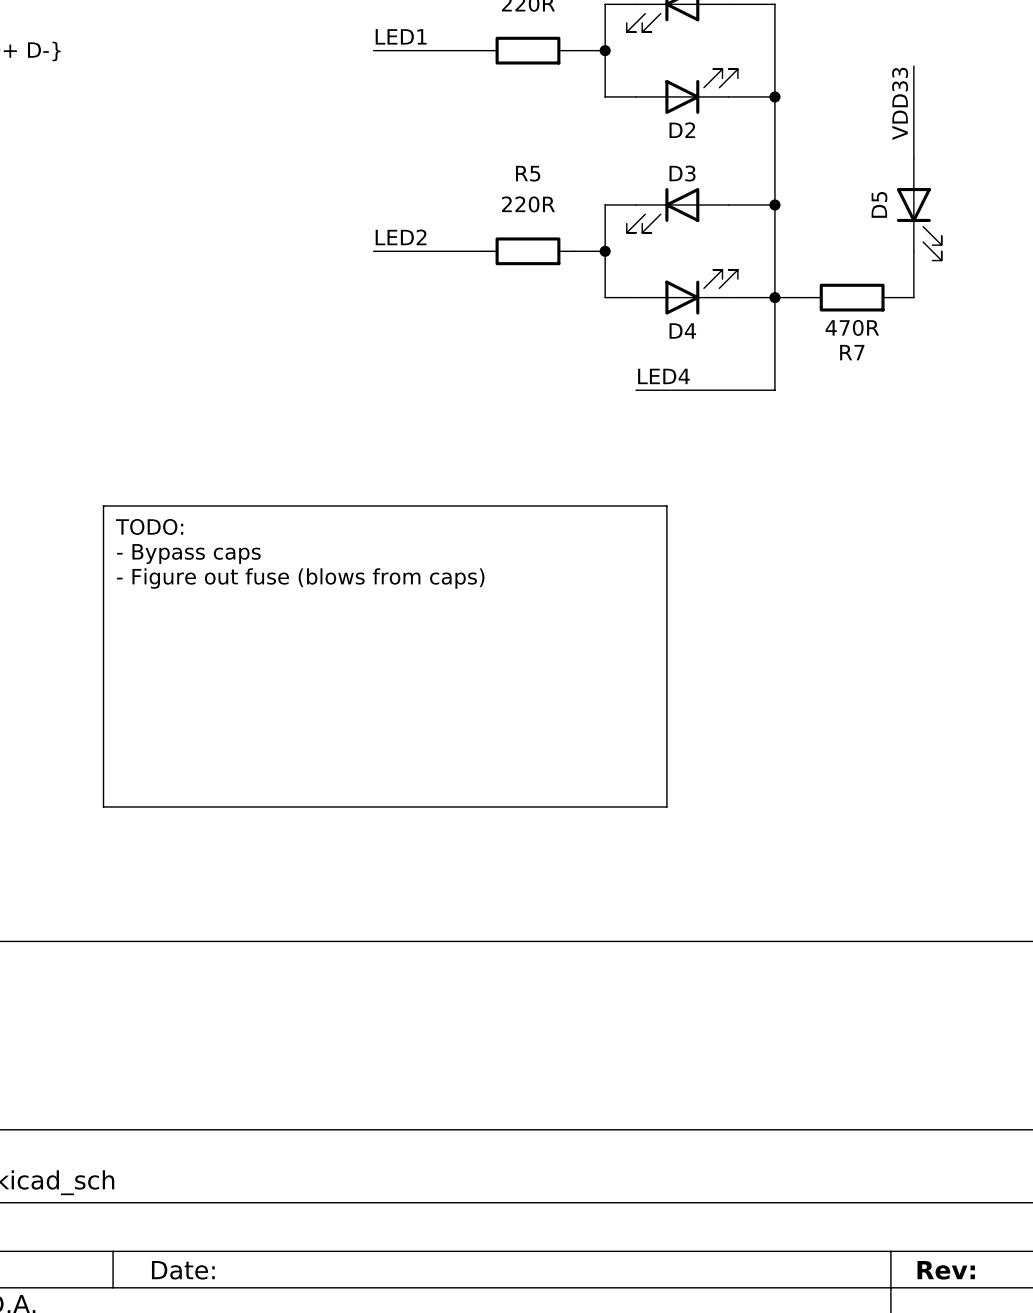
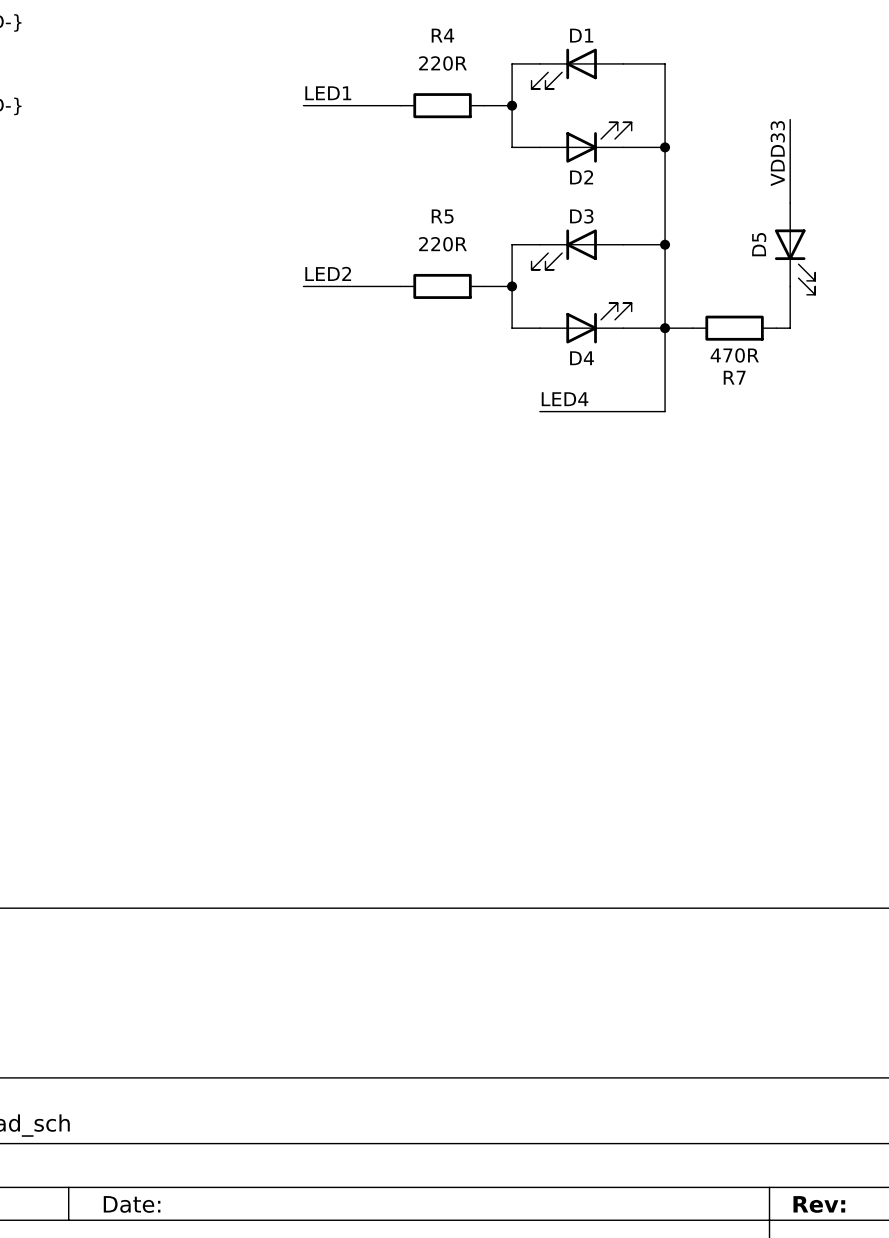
line: (103, 506) (666, 506) (666, 806) (103, 806) (103, 506) -> none
text: TODO: (149, 526) -> none
text: - Bypass caps (188, 554) -> none
text: - Figure out fuse (blows from caps) (300, 578) -> none

